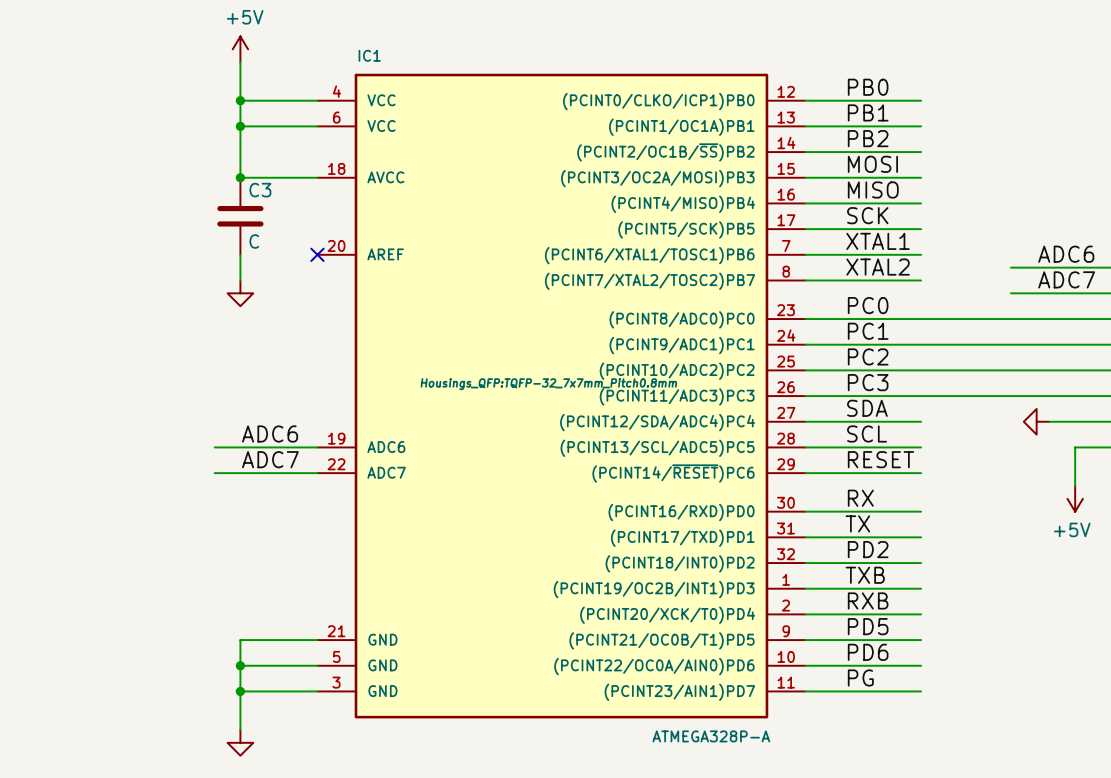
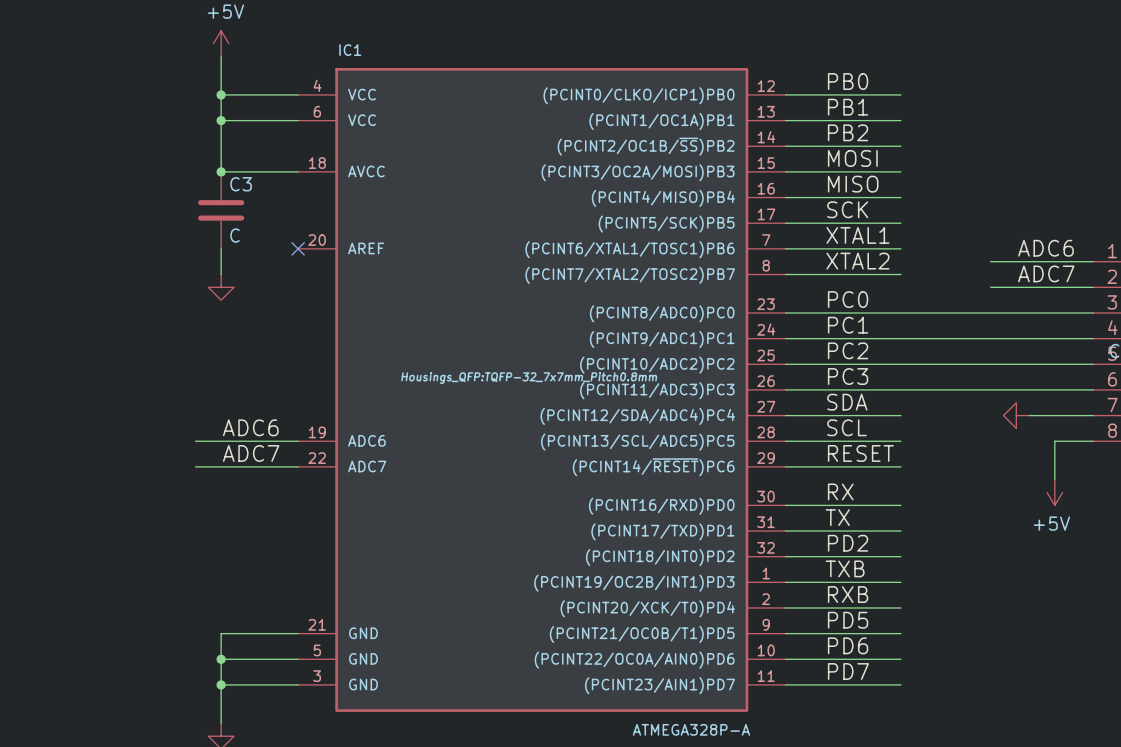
label: PG (860, 678) -> PD7 (848, 671)

